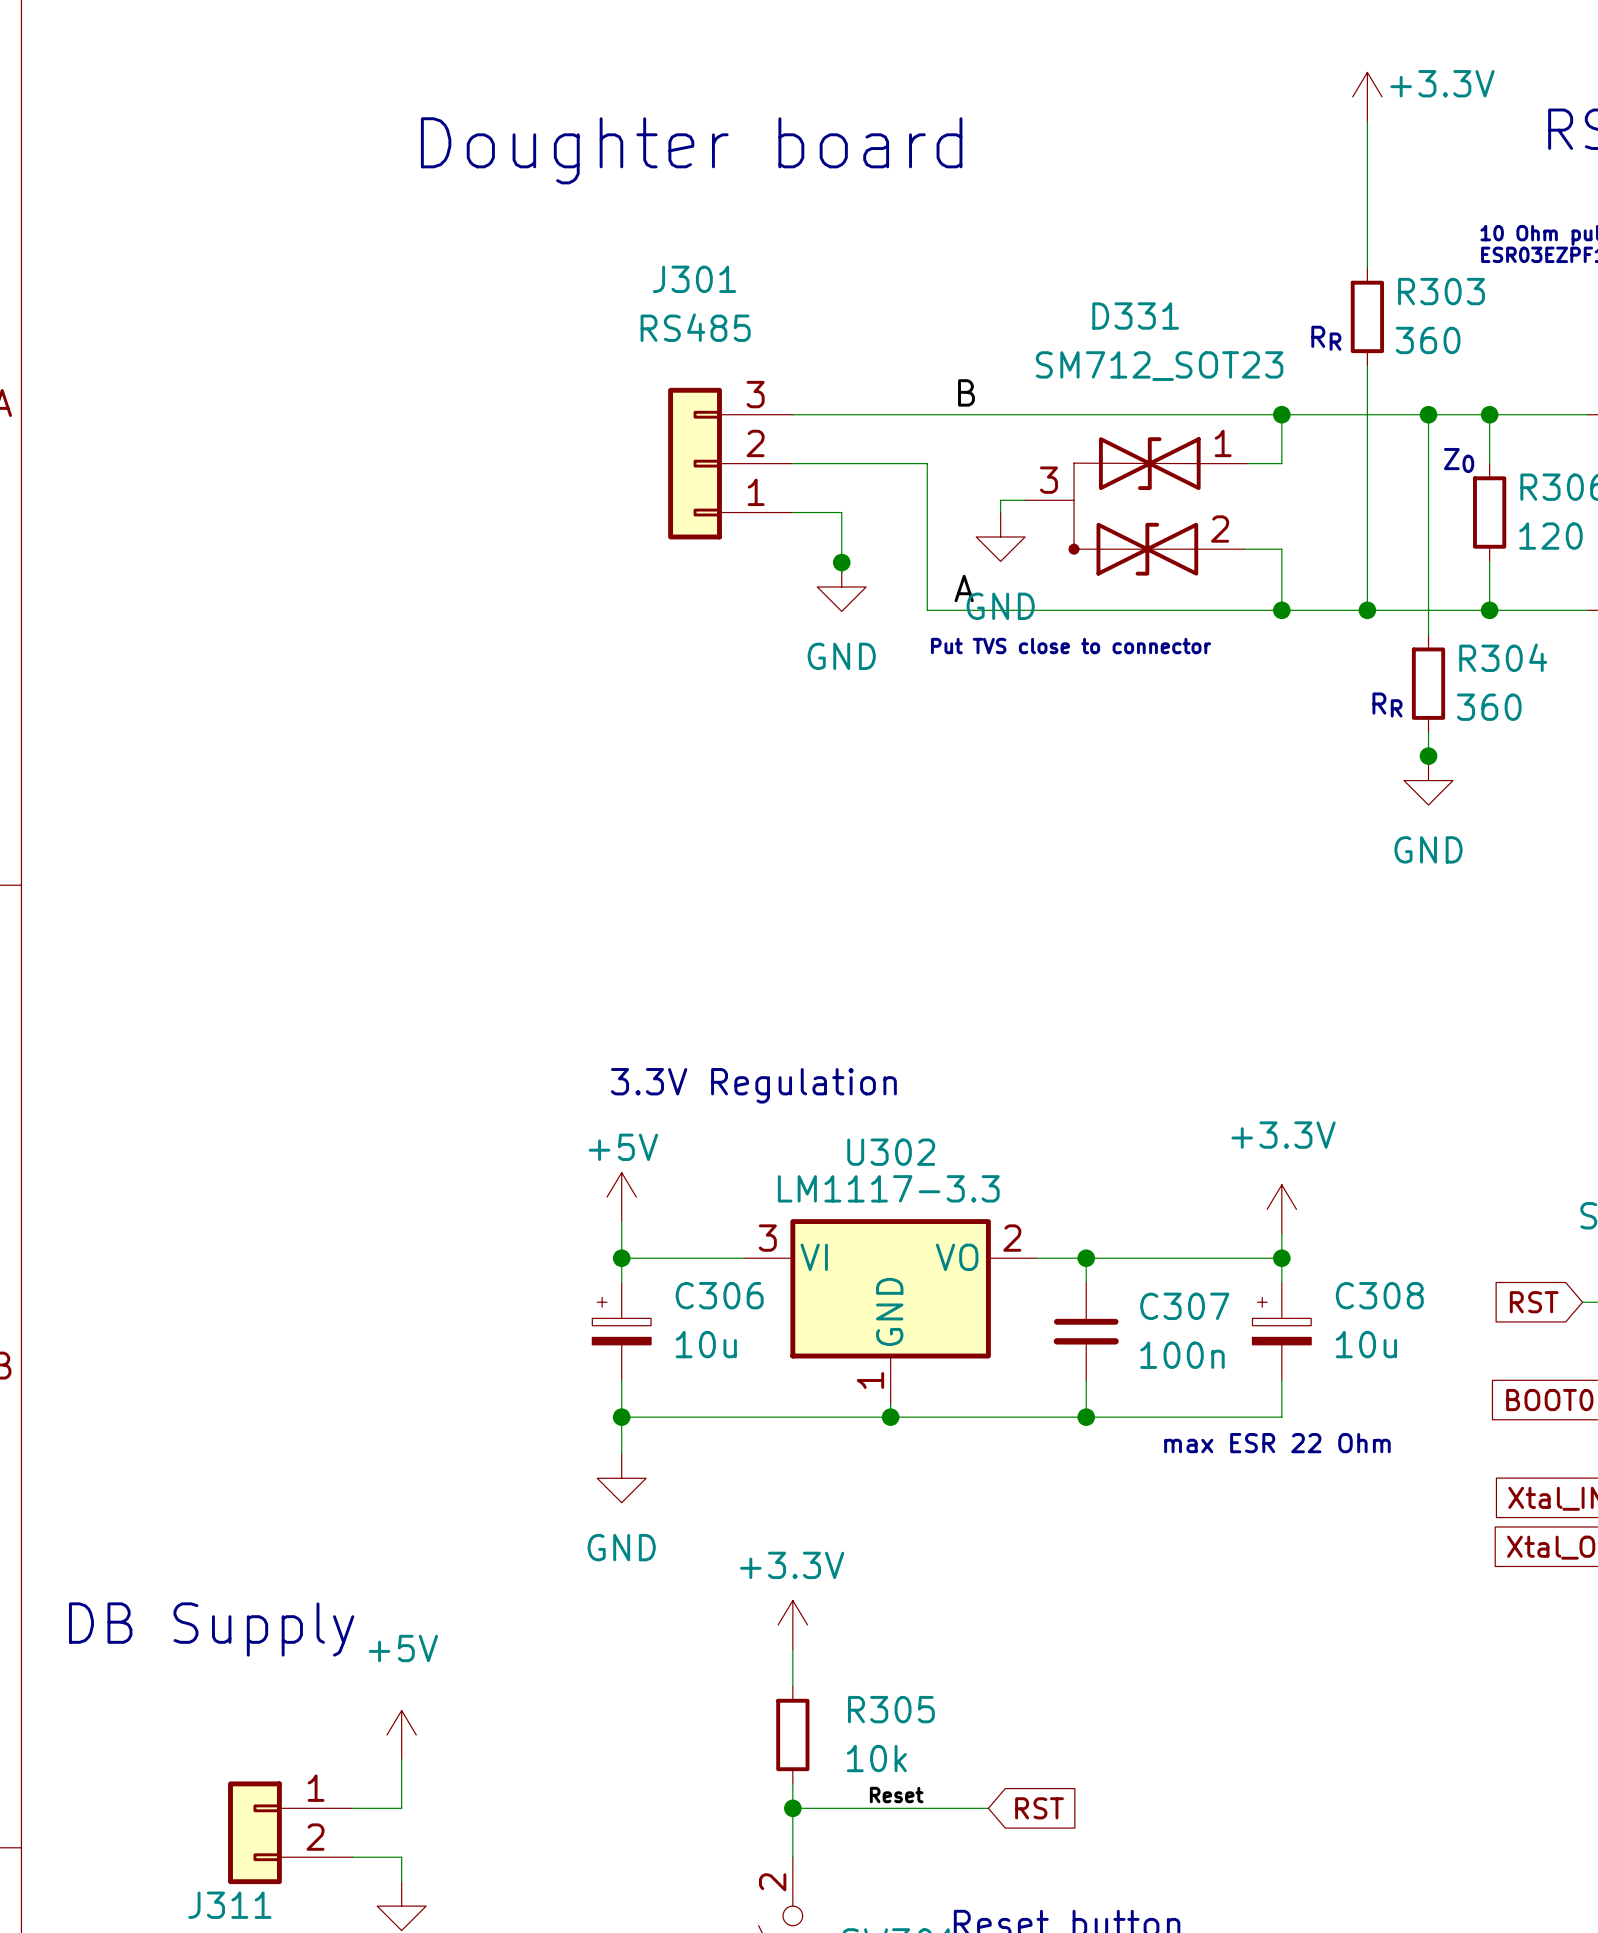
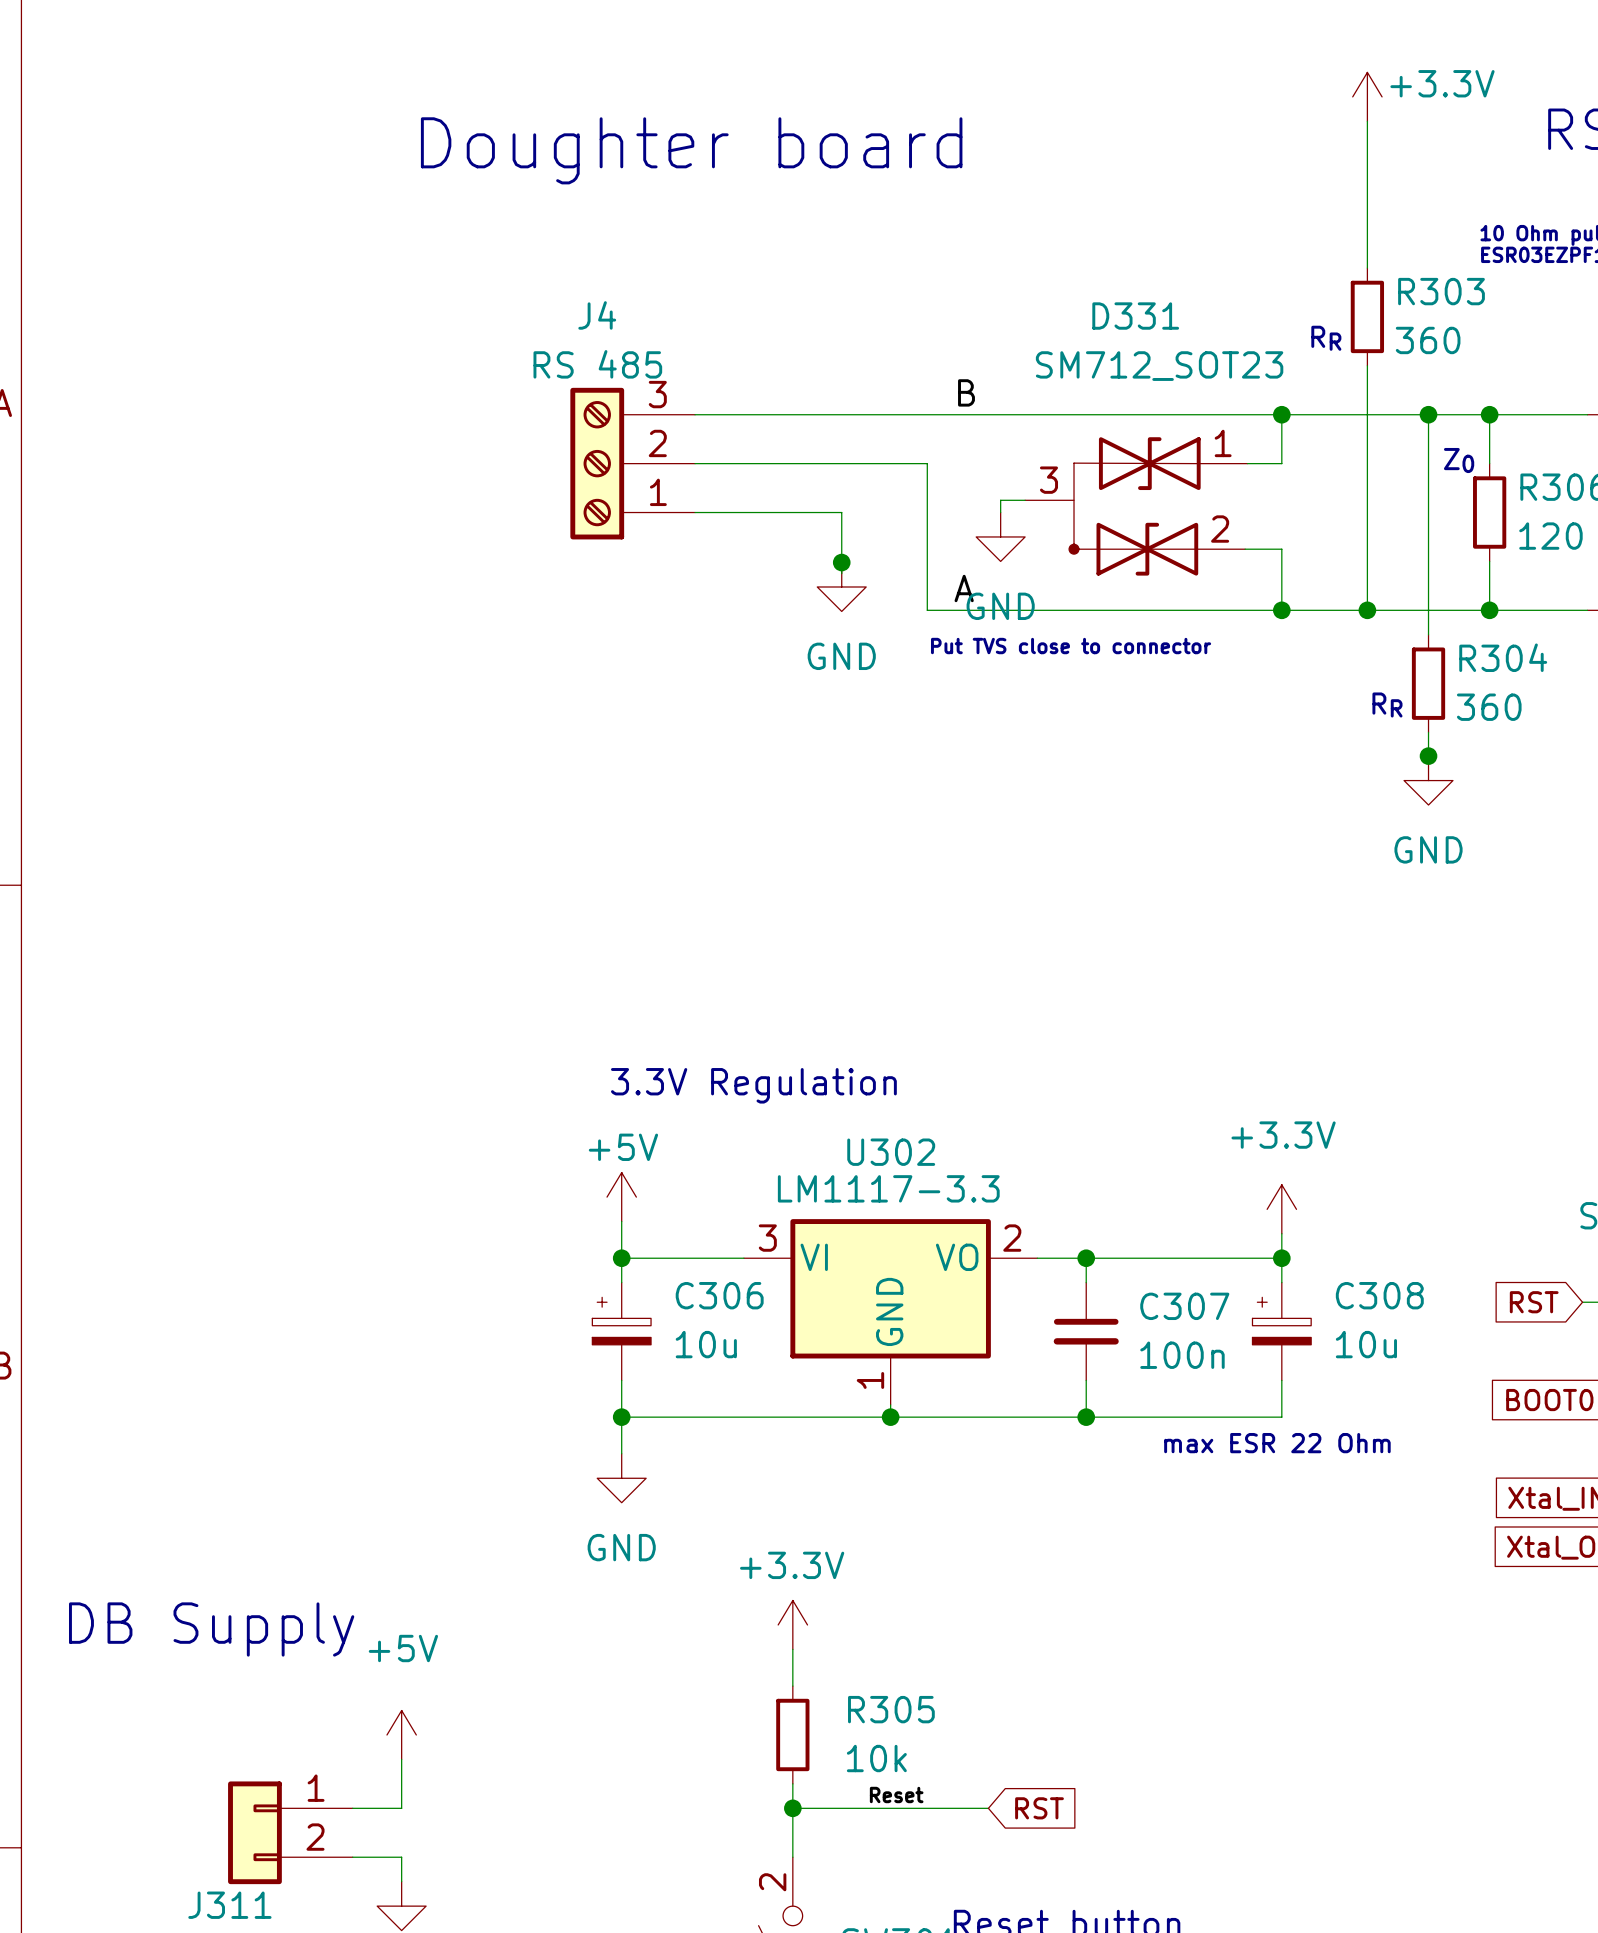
J4: none -> RS 485 (632, 463)
J301: RS485 (730, 463) -> none

